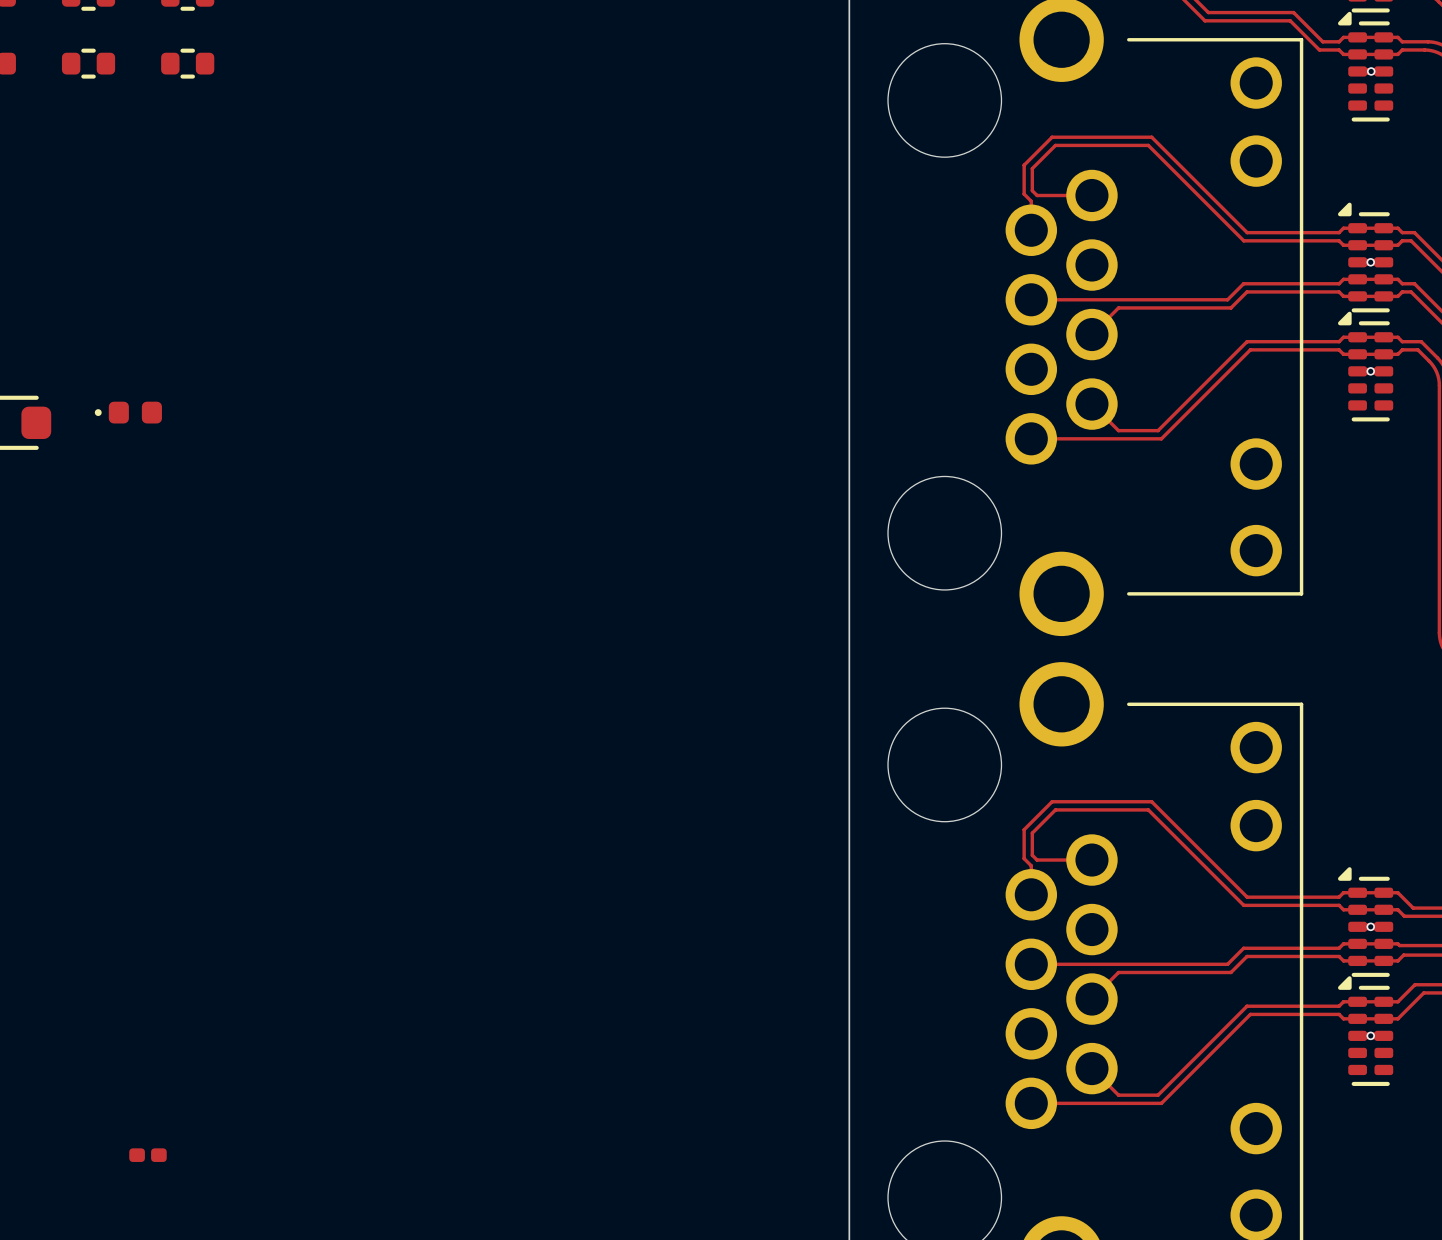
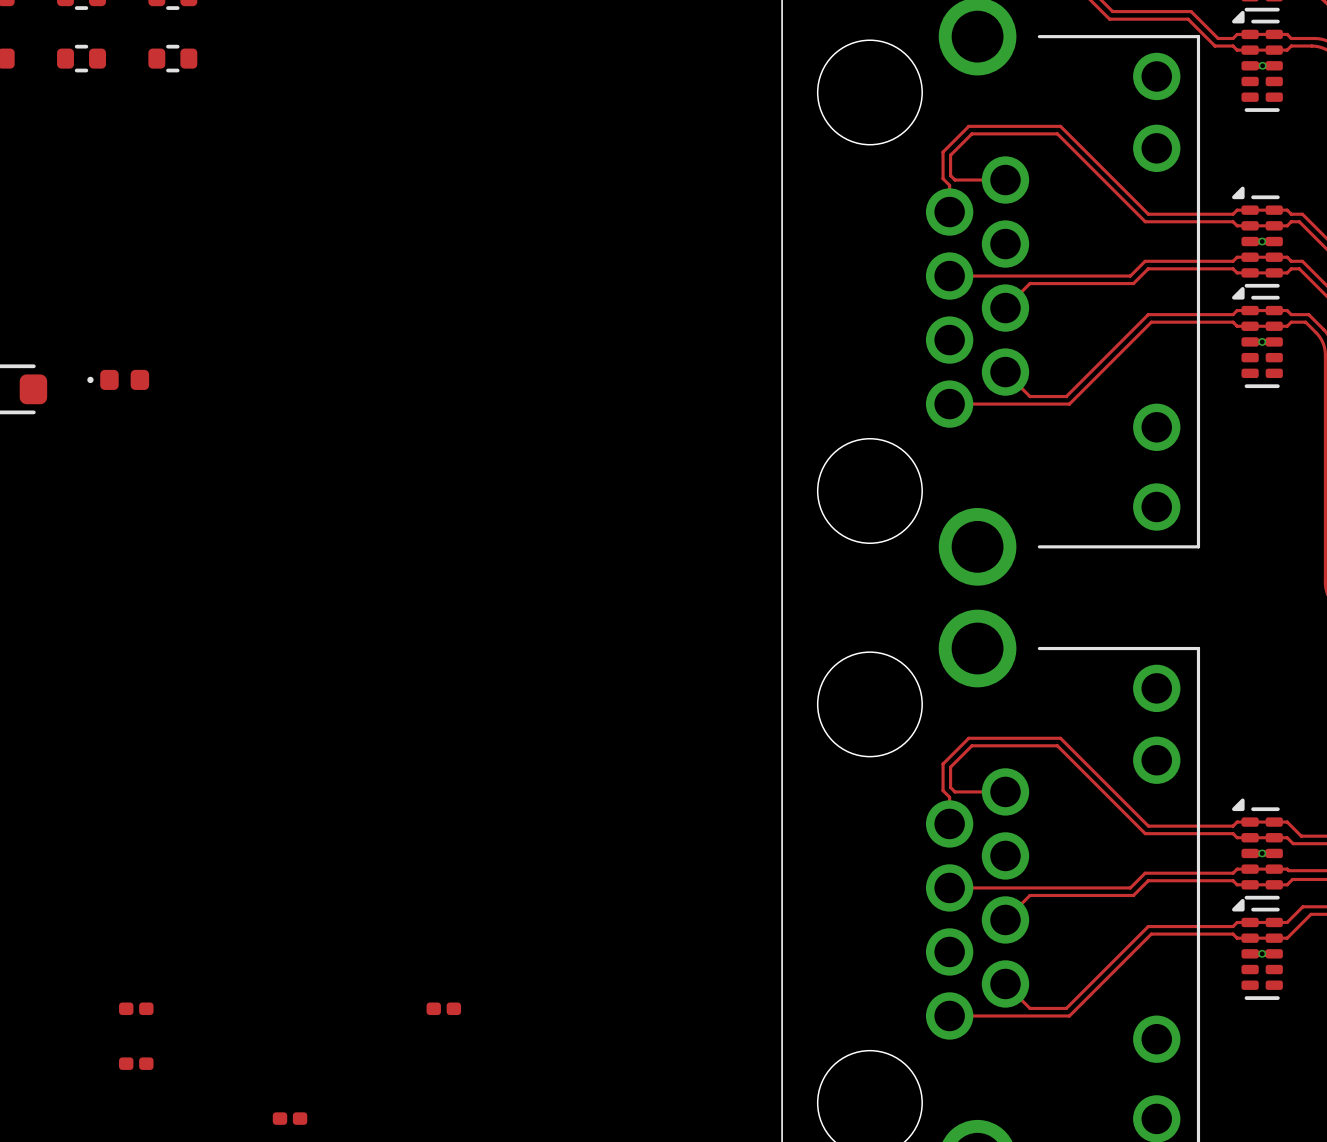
part: none -> (136, 1008)
part: none -> (443, 1008)
part: none -> (290, 1118)

